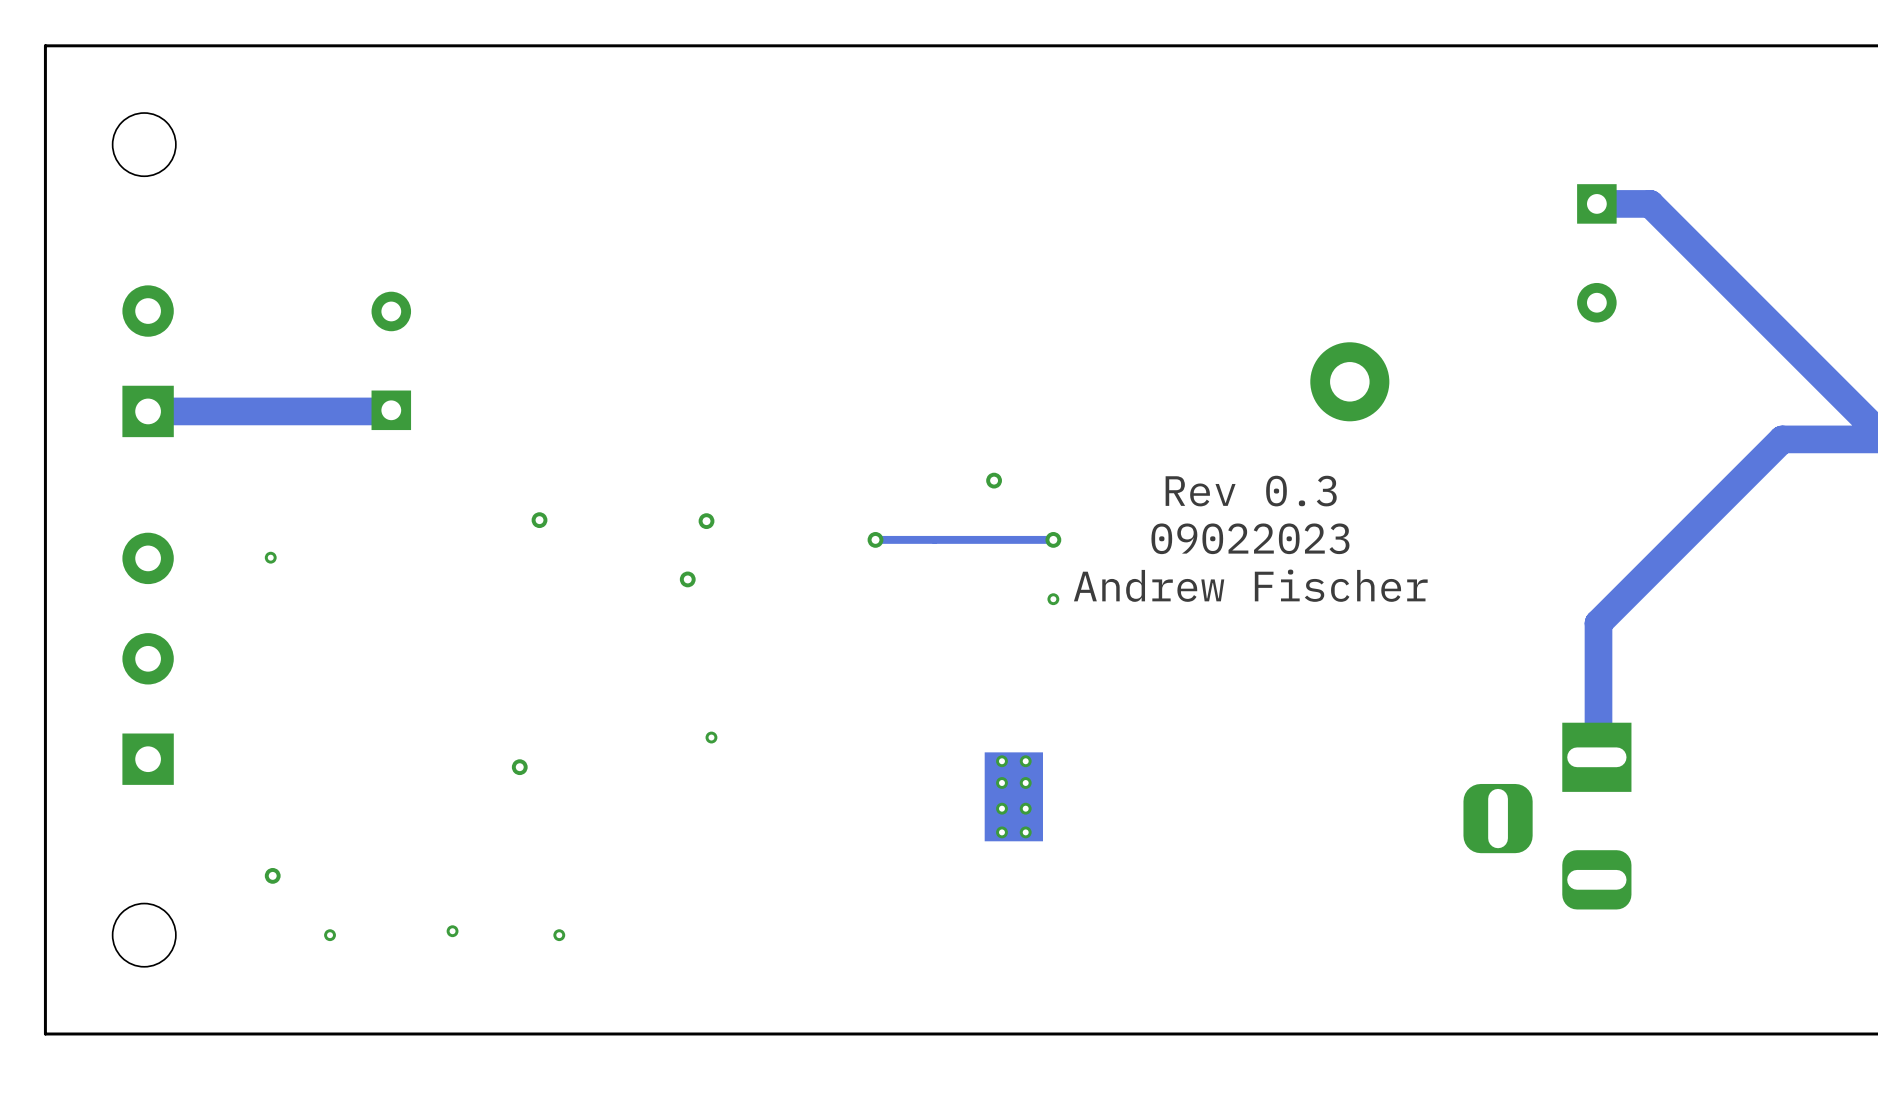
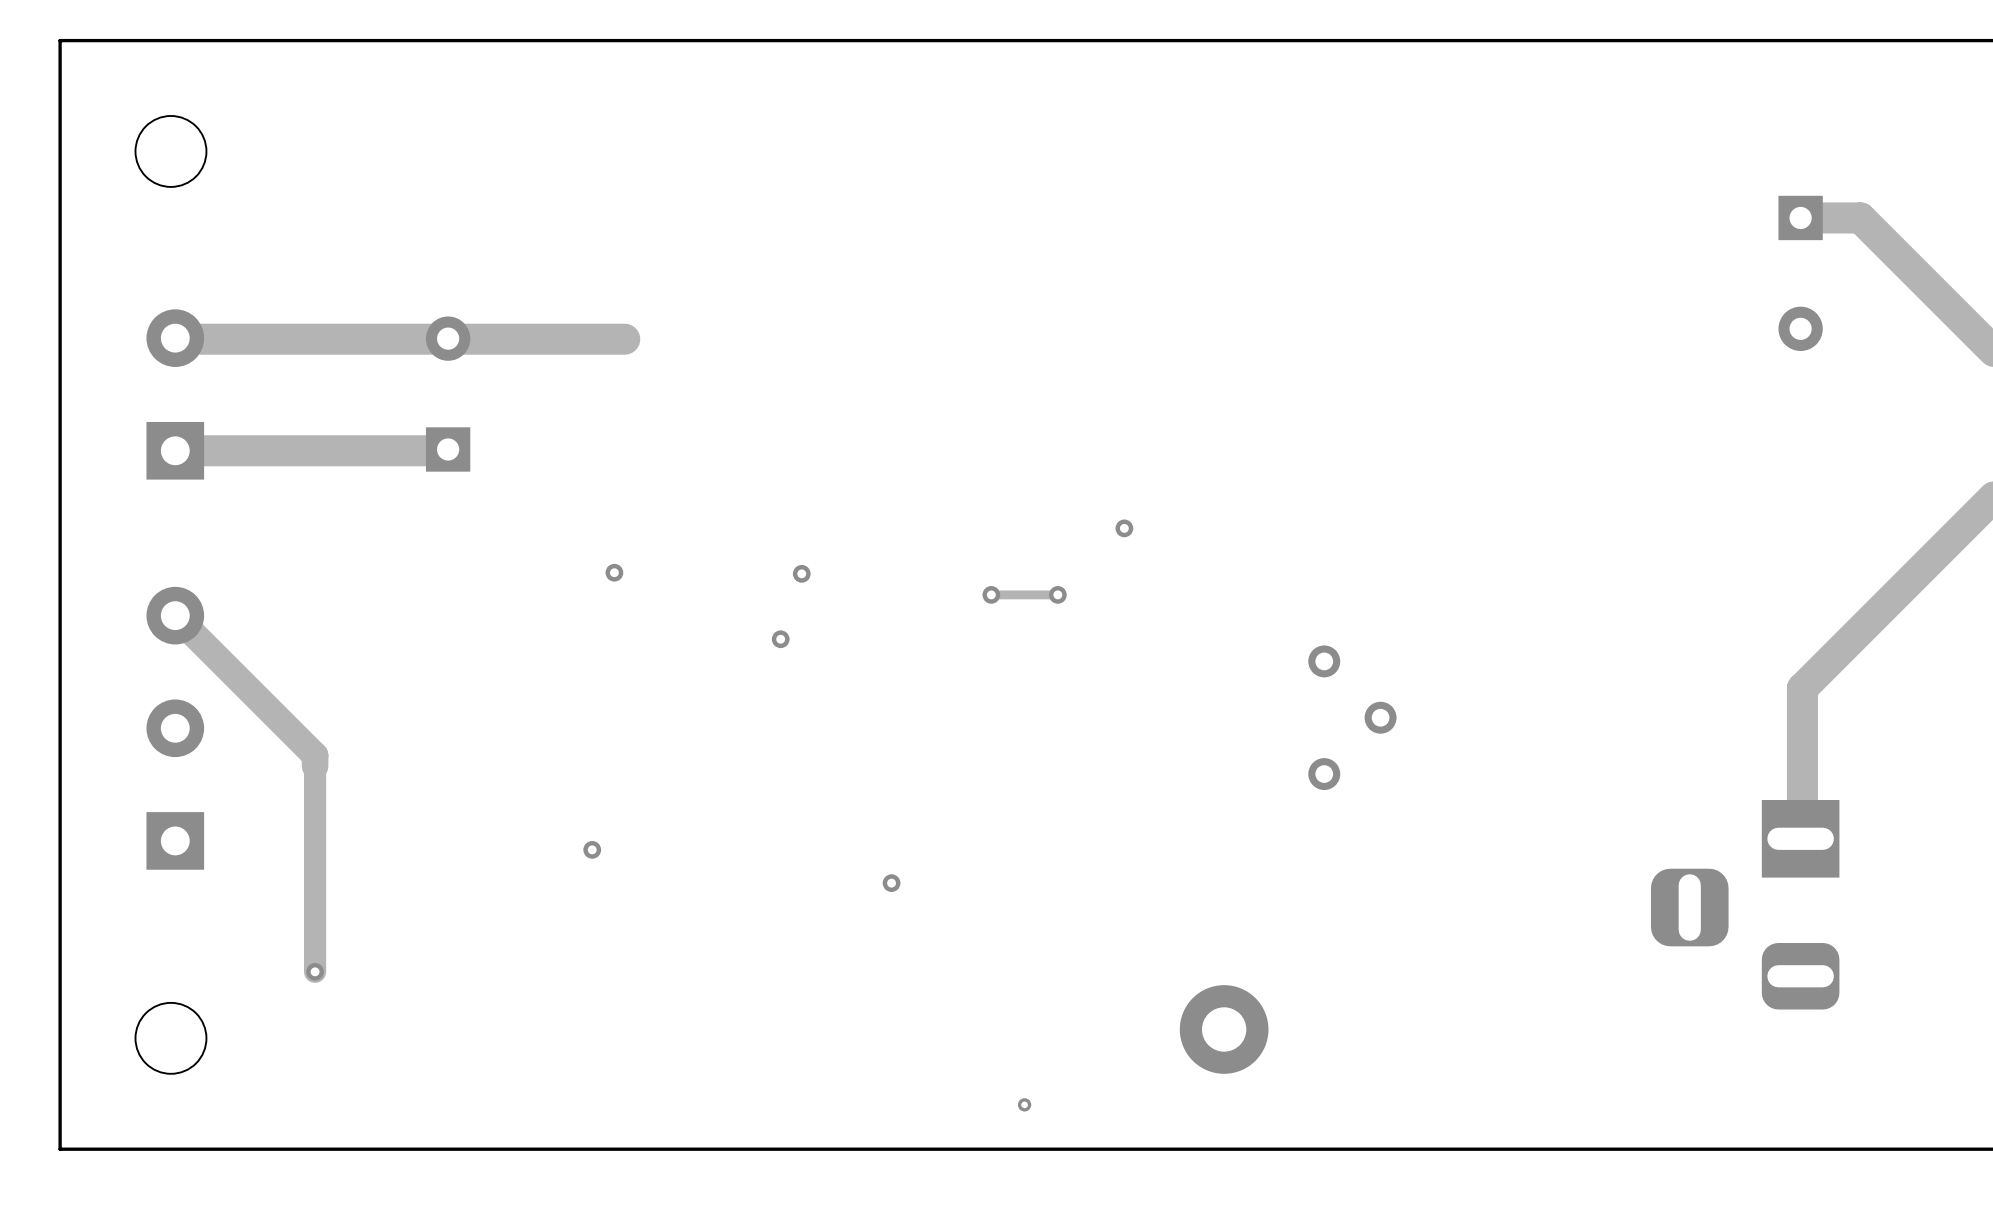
track: none -> (624, 339) (172, 339)
part: (1349, 381) -> none
text: Rev 0.3 (1251, 491) -> none
text: 09022023 (1250, 538) -> none
track: (1053, 539) (934, 539) -> none
via position: (1053, 539) -> (1057, 594)
via: (270, 557) -> none
track: none -> (175, 615) (315, 755) (315, 971)
text: Andrew Fischer (1250, 585) -> none
via: (1053, 599) -> none
part: none -> (1352, 717)
via: (711, 737) -> none
via: none -> (891, 883)
part: (1013, 796) -> none
part: none -> (1224, 1029)
via: (452, 931) -> none
via: (330, 935) -> none
via: (559, 935) -> none
via: none -> (1024, 1104)

